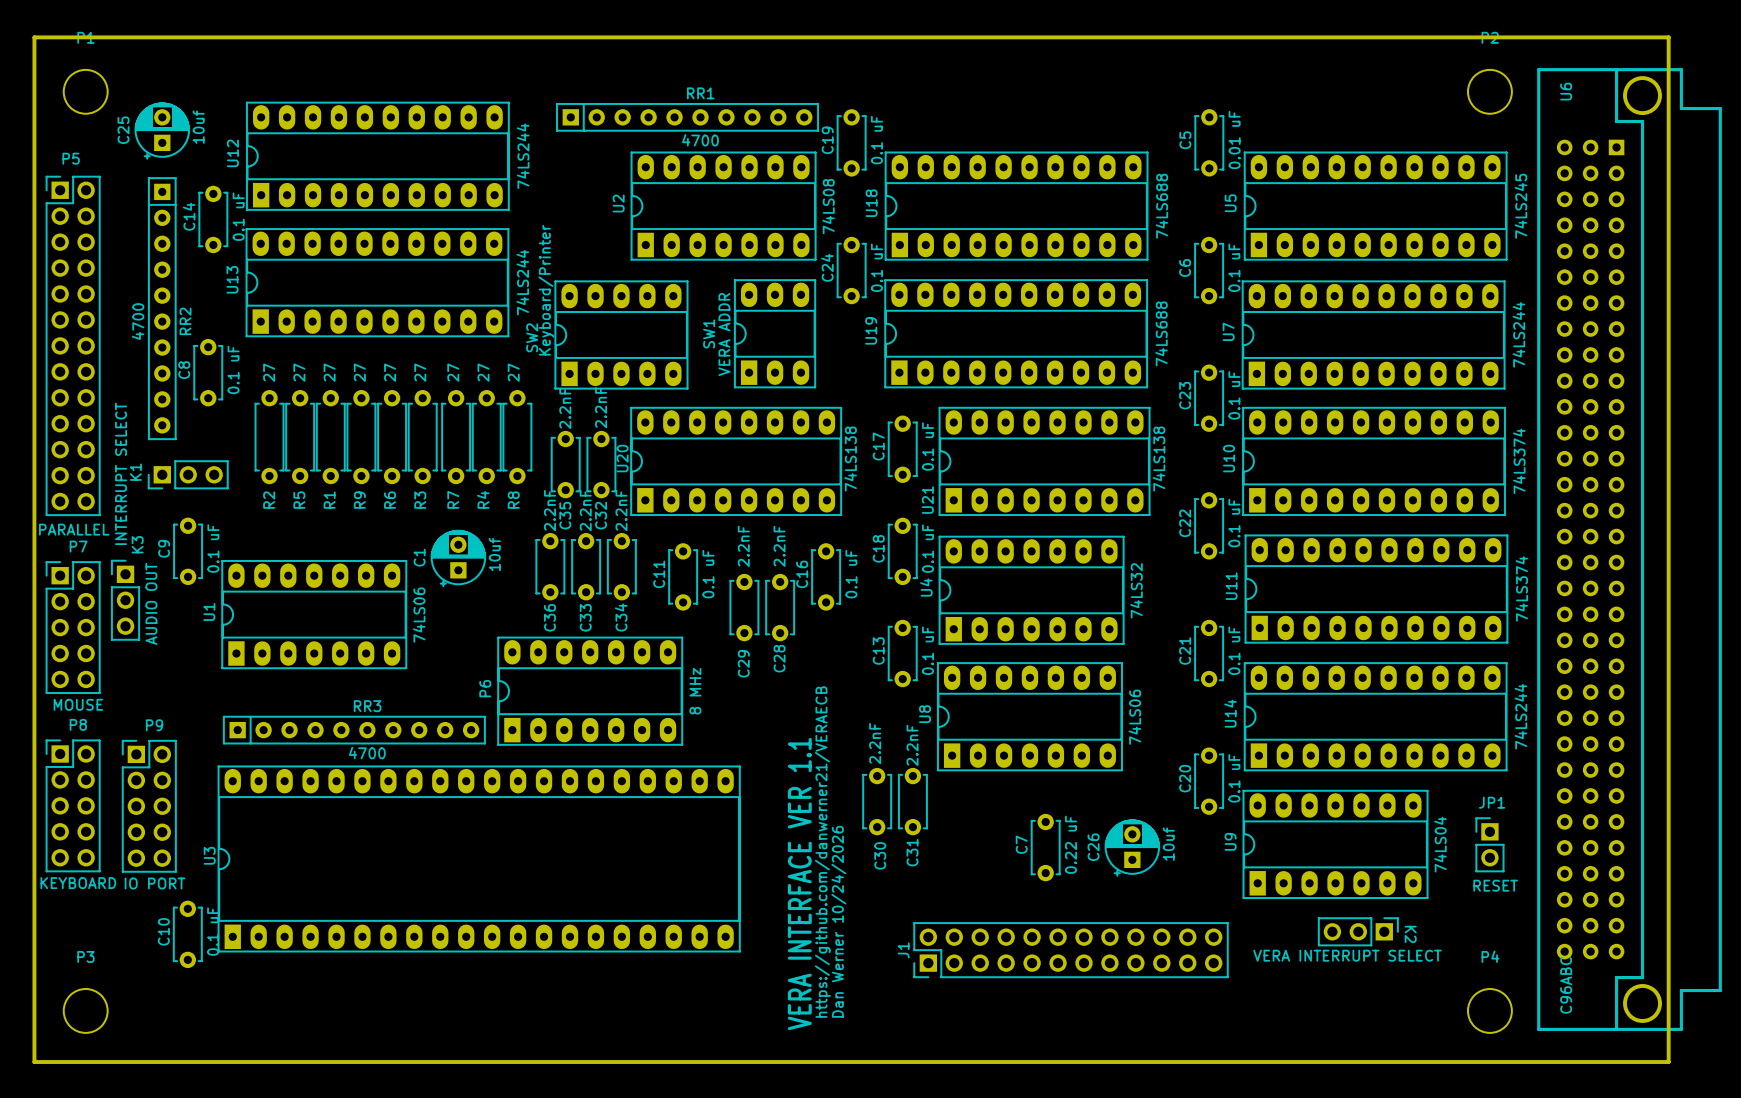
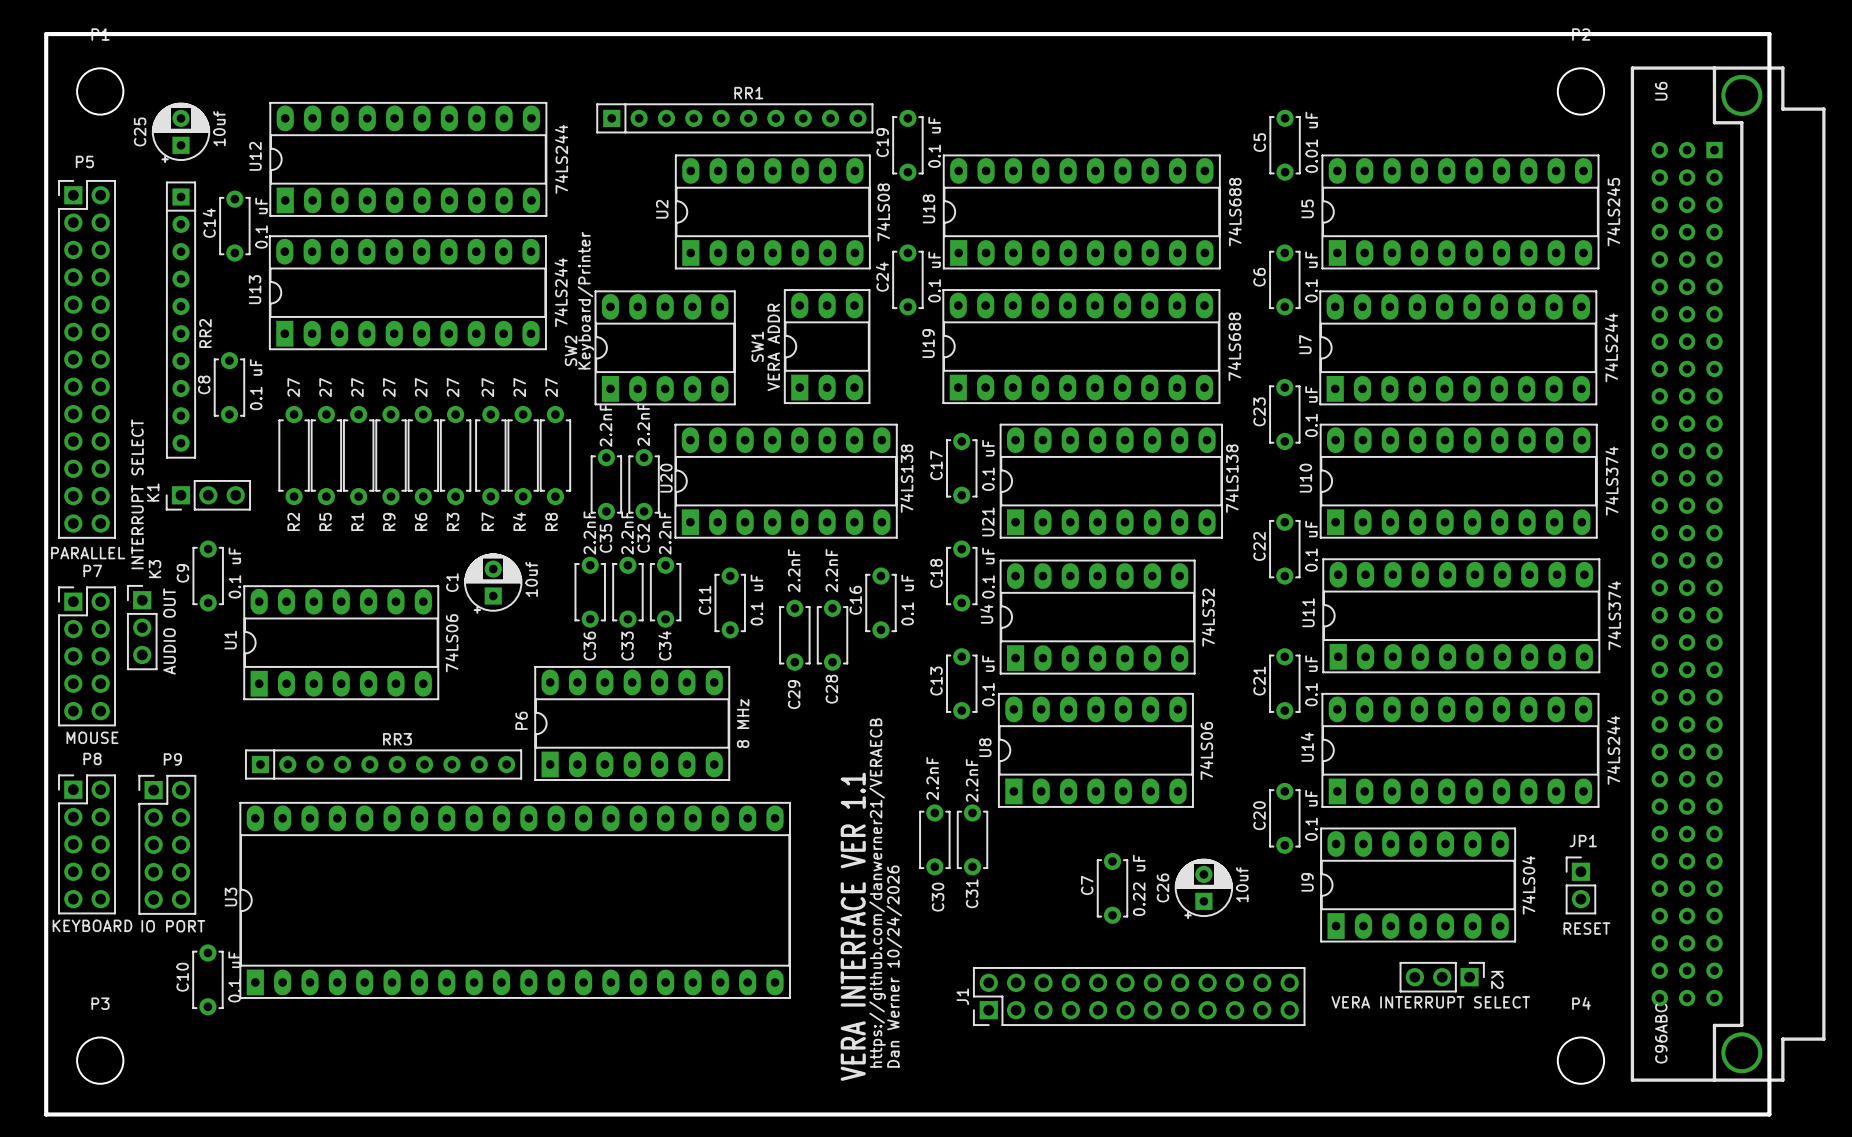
RR1 value: 4700 (700, 140) -> none
RR2 value: 4700 (138, 321) -> none
RR3 value: 4700 (367, 753) -> none

